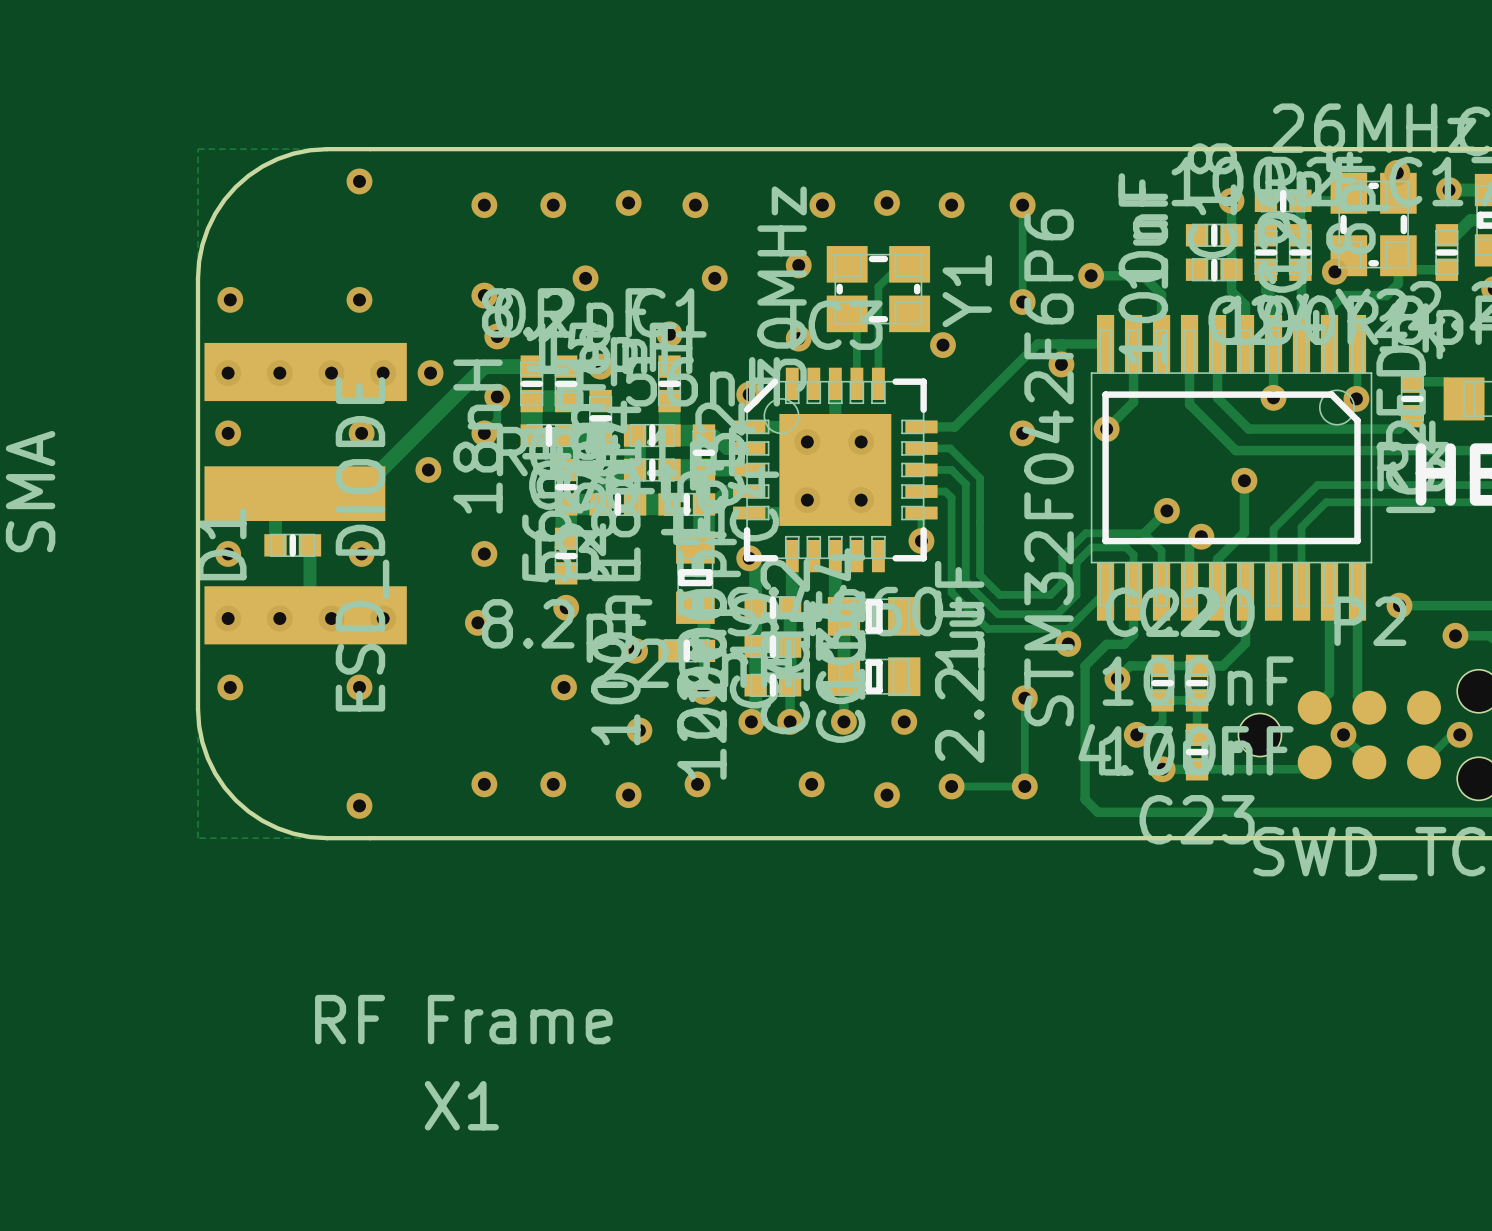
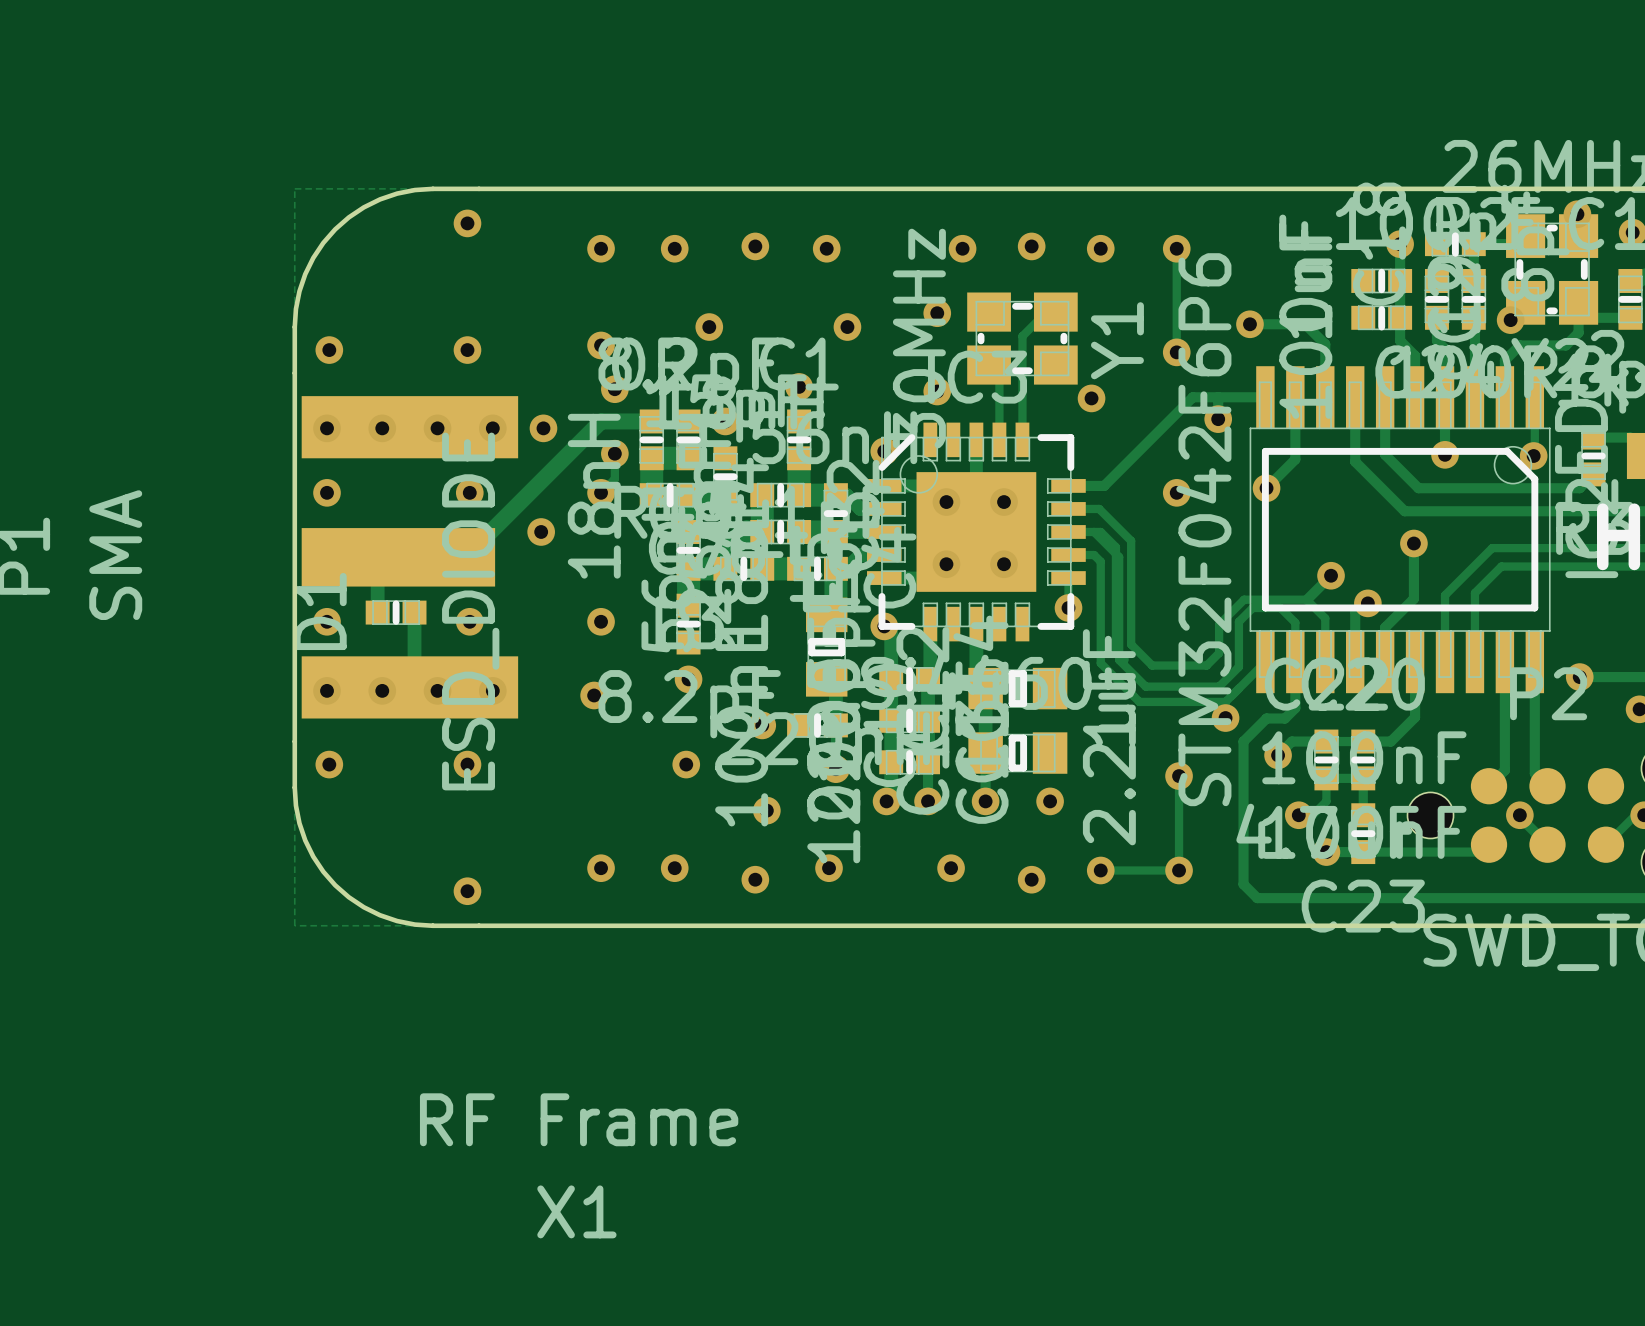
track: (1126, 547) (1091, 547) (1076, 562) (1076, 595) (1057, 614) (998, 614) (974, 589) -> (1287, 614) (1280, 607) (1252, 607) (1238, 621) (1238, 666) (1219, 686) (1145, 686) (1119, 660) (1119, 557) (1094, 531)

